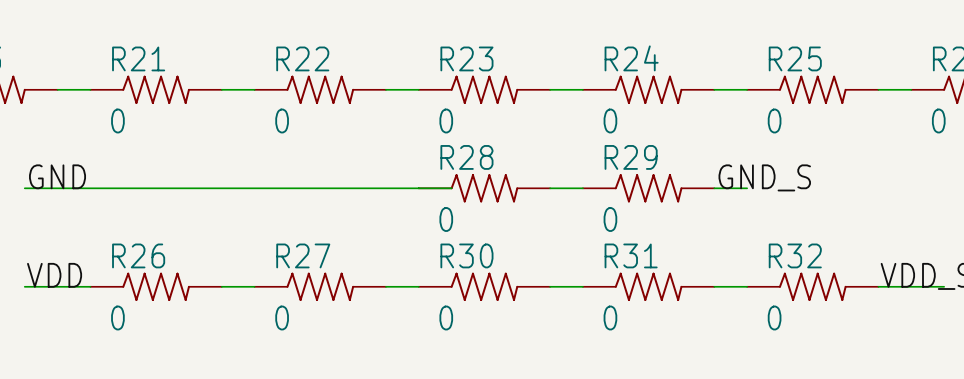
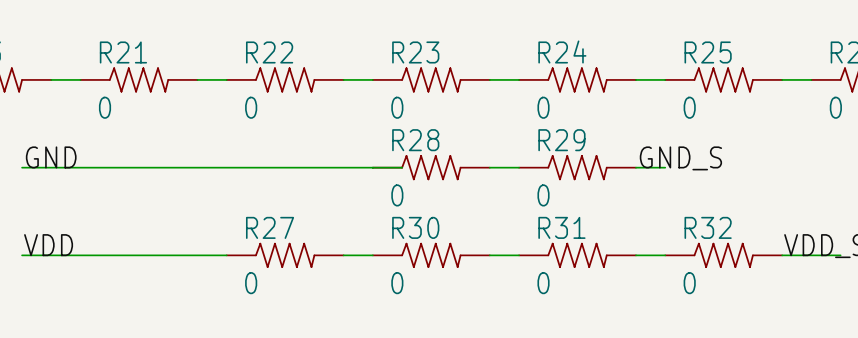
R26: 0 (156, 286) -> none

